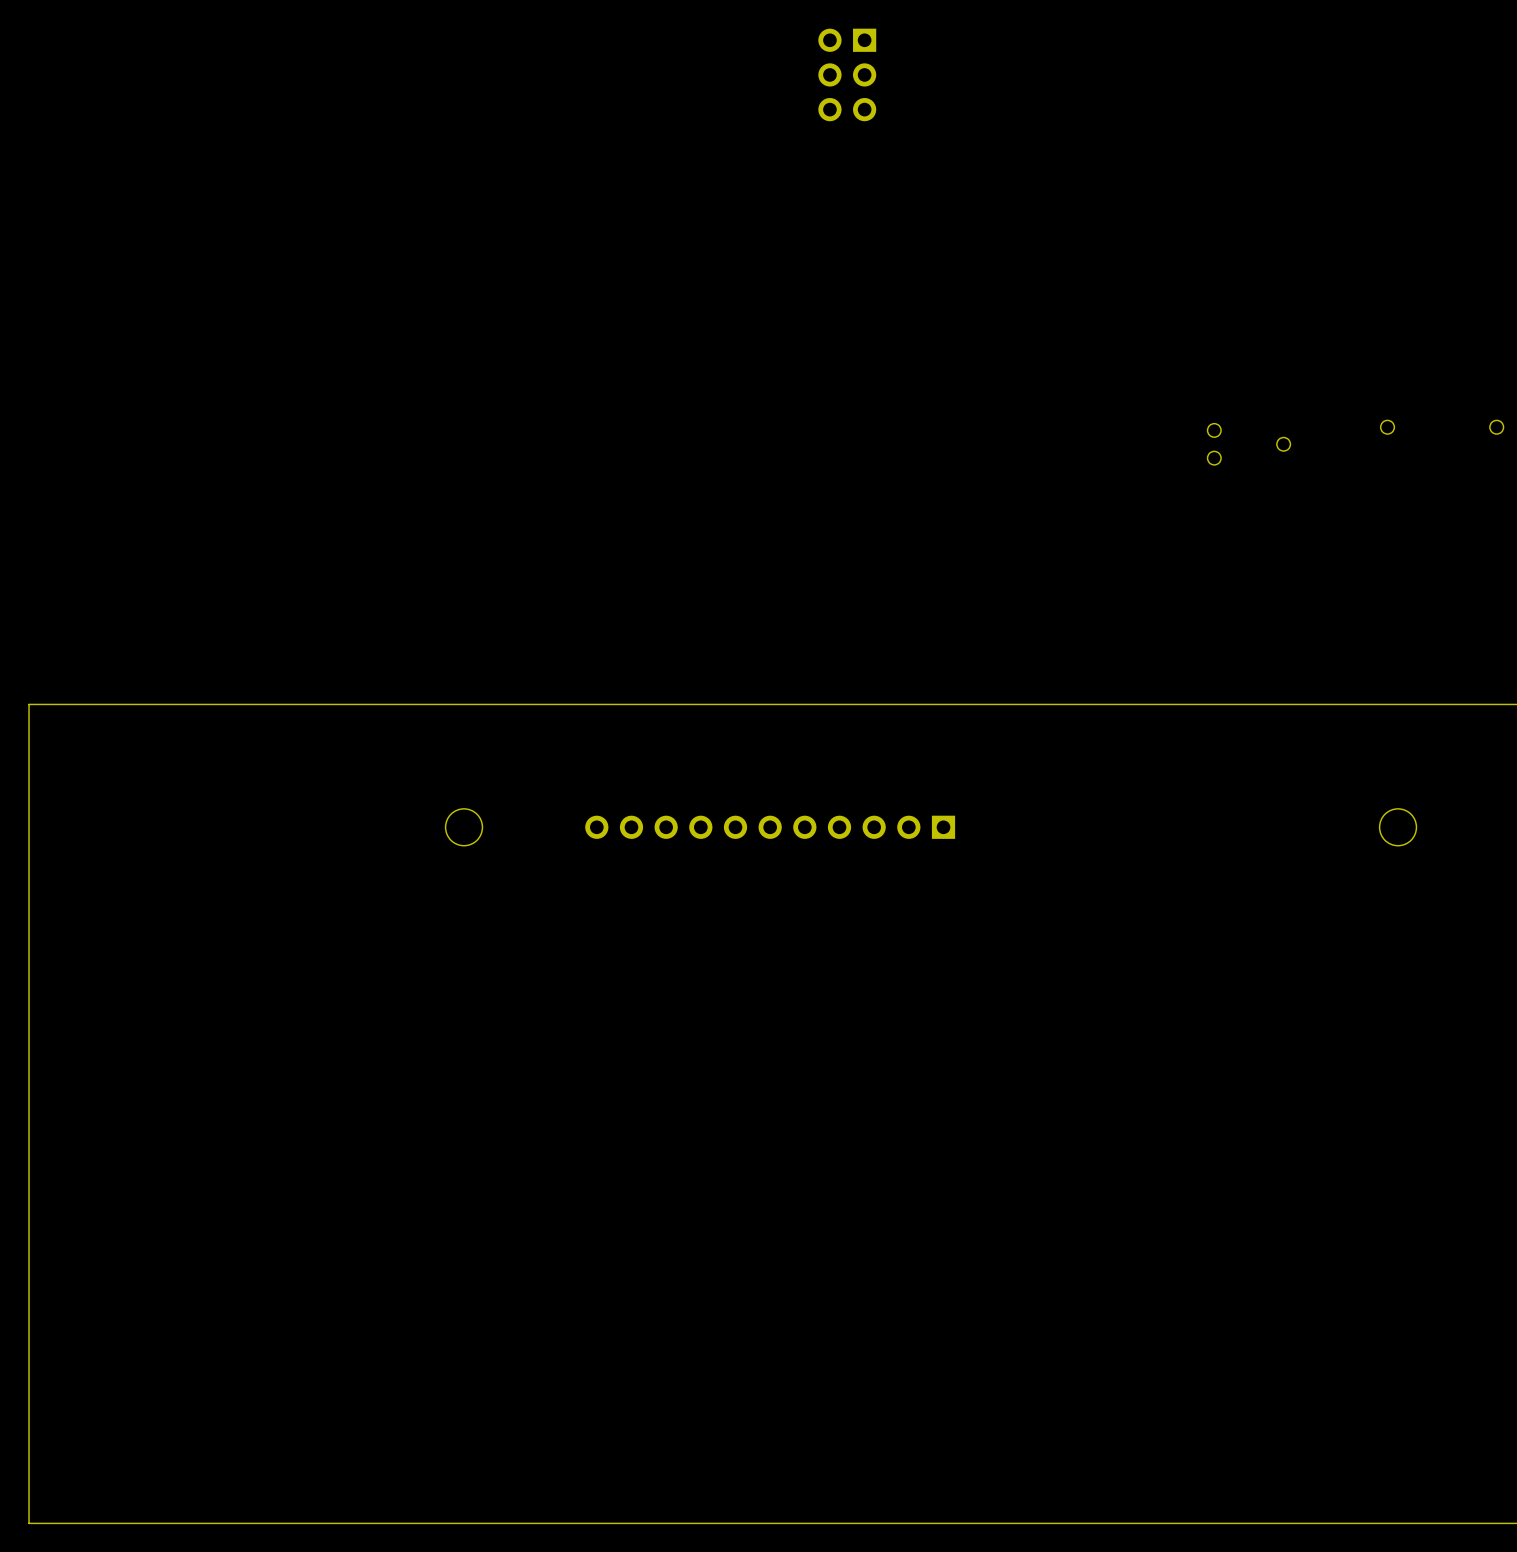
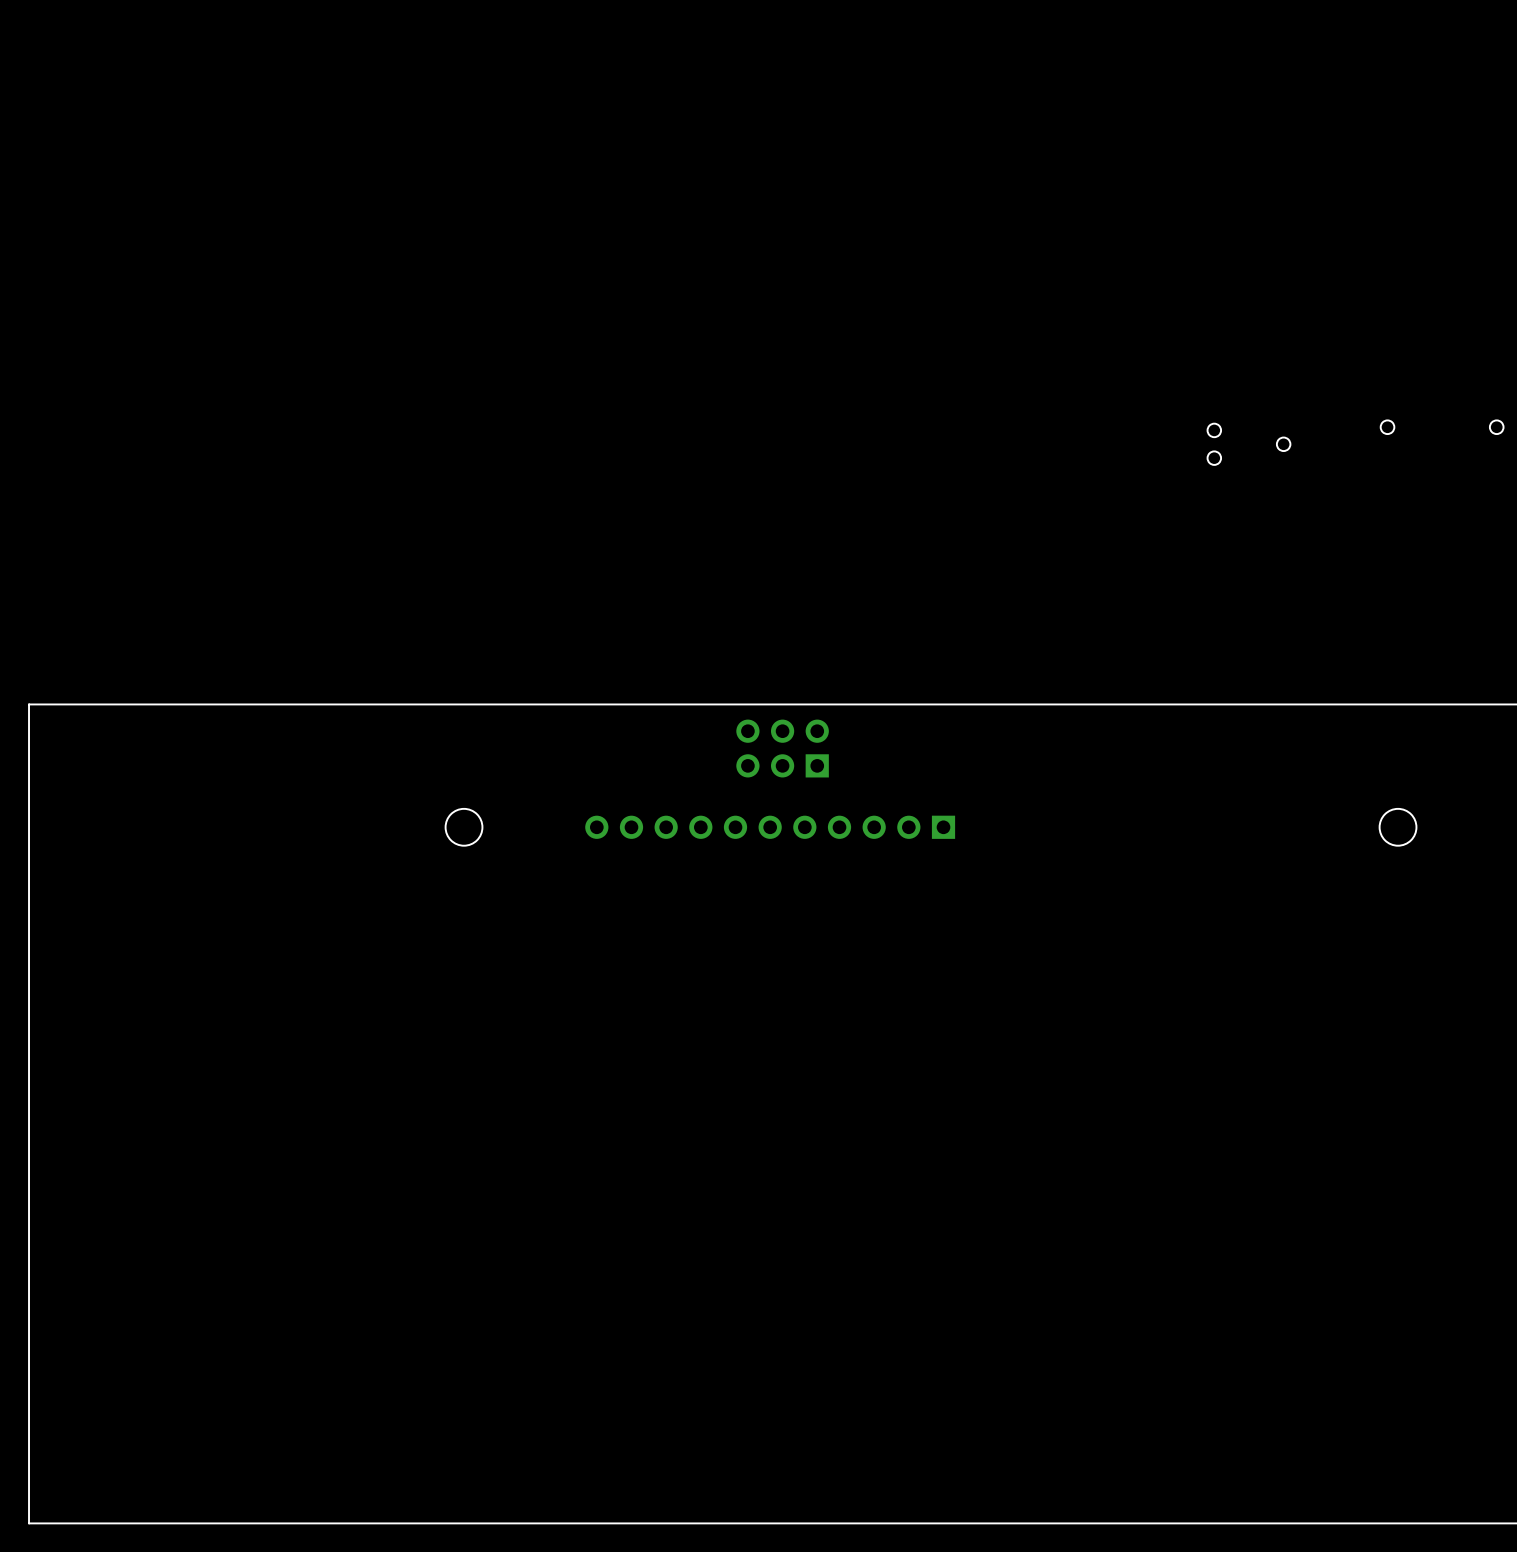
part: (847, 74) -> none
part: none -> (782, 748)

